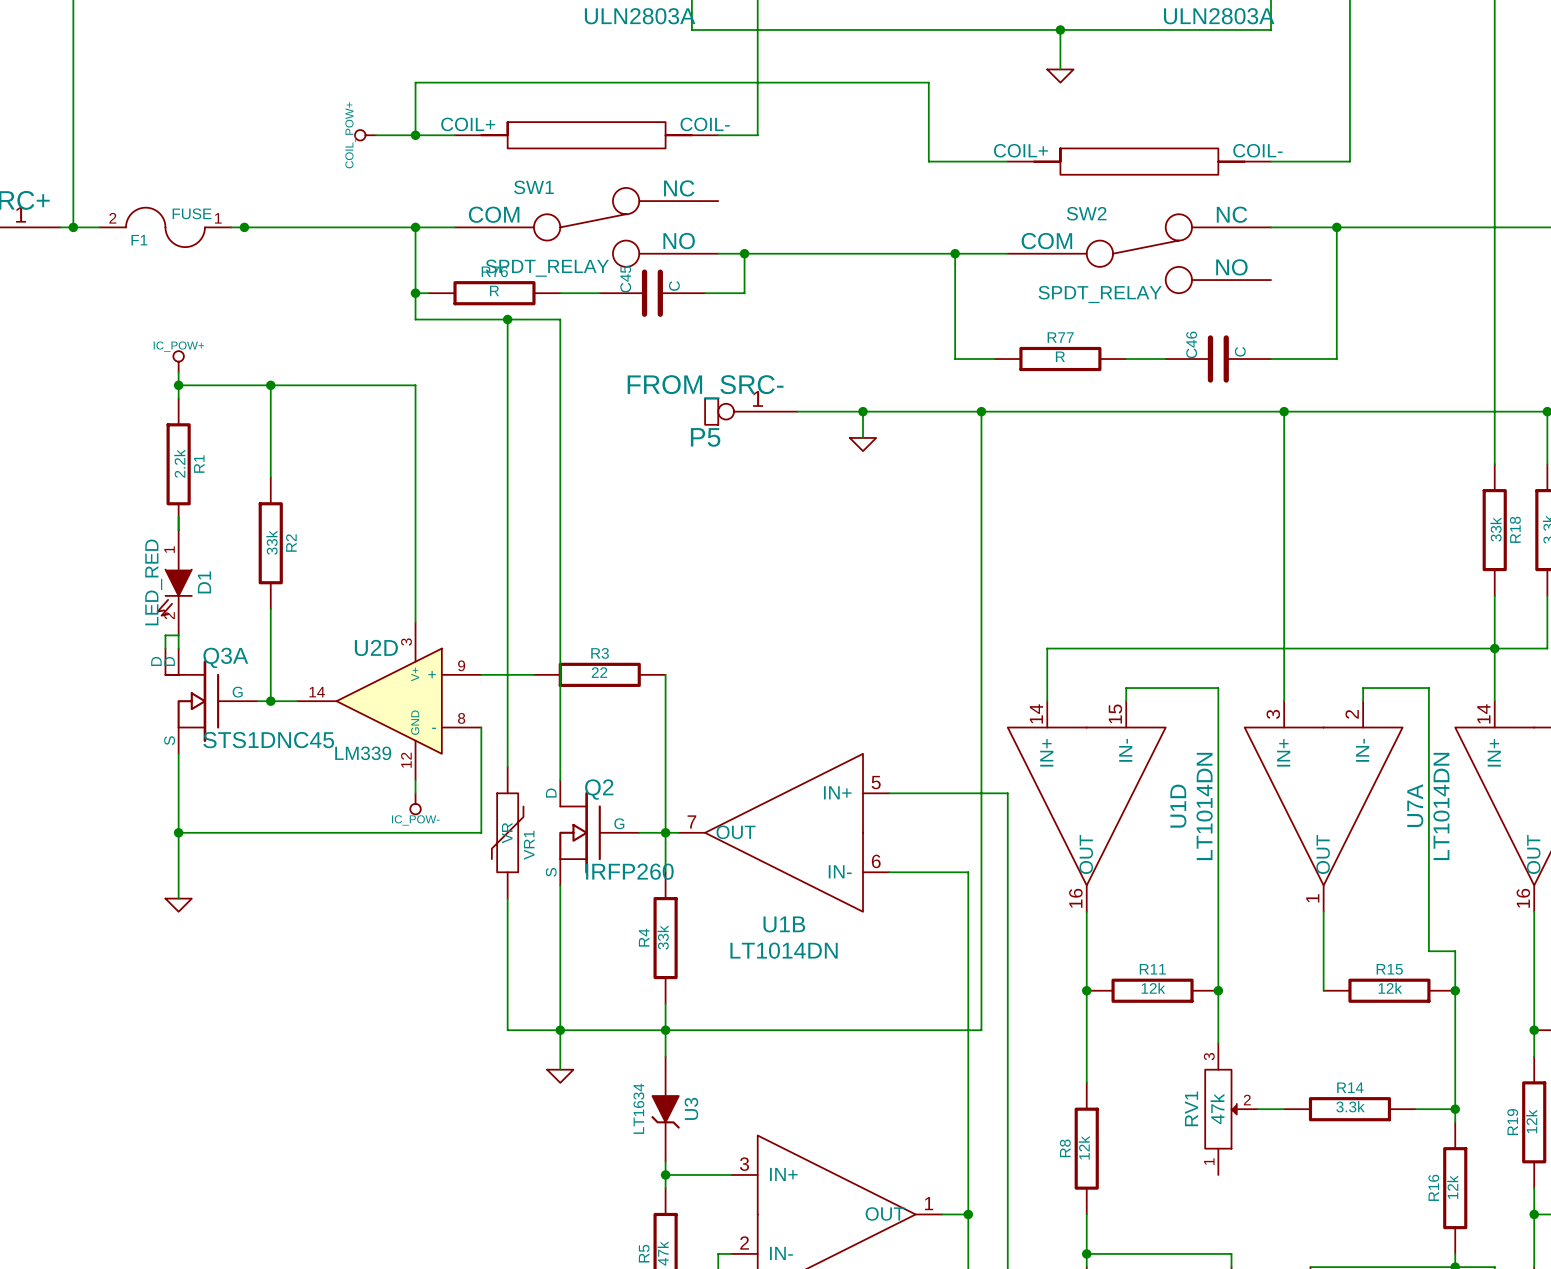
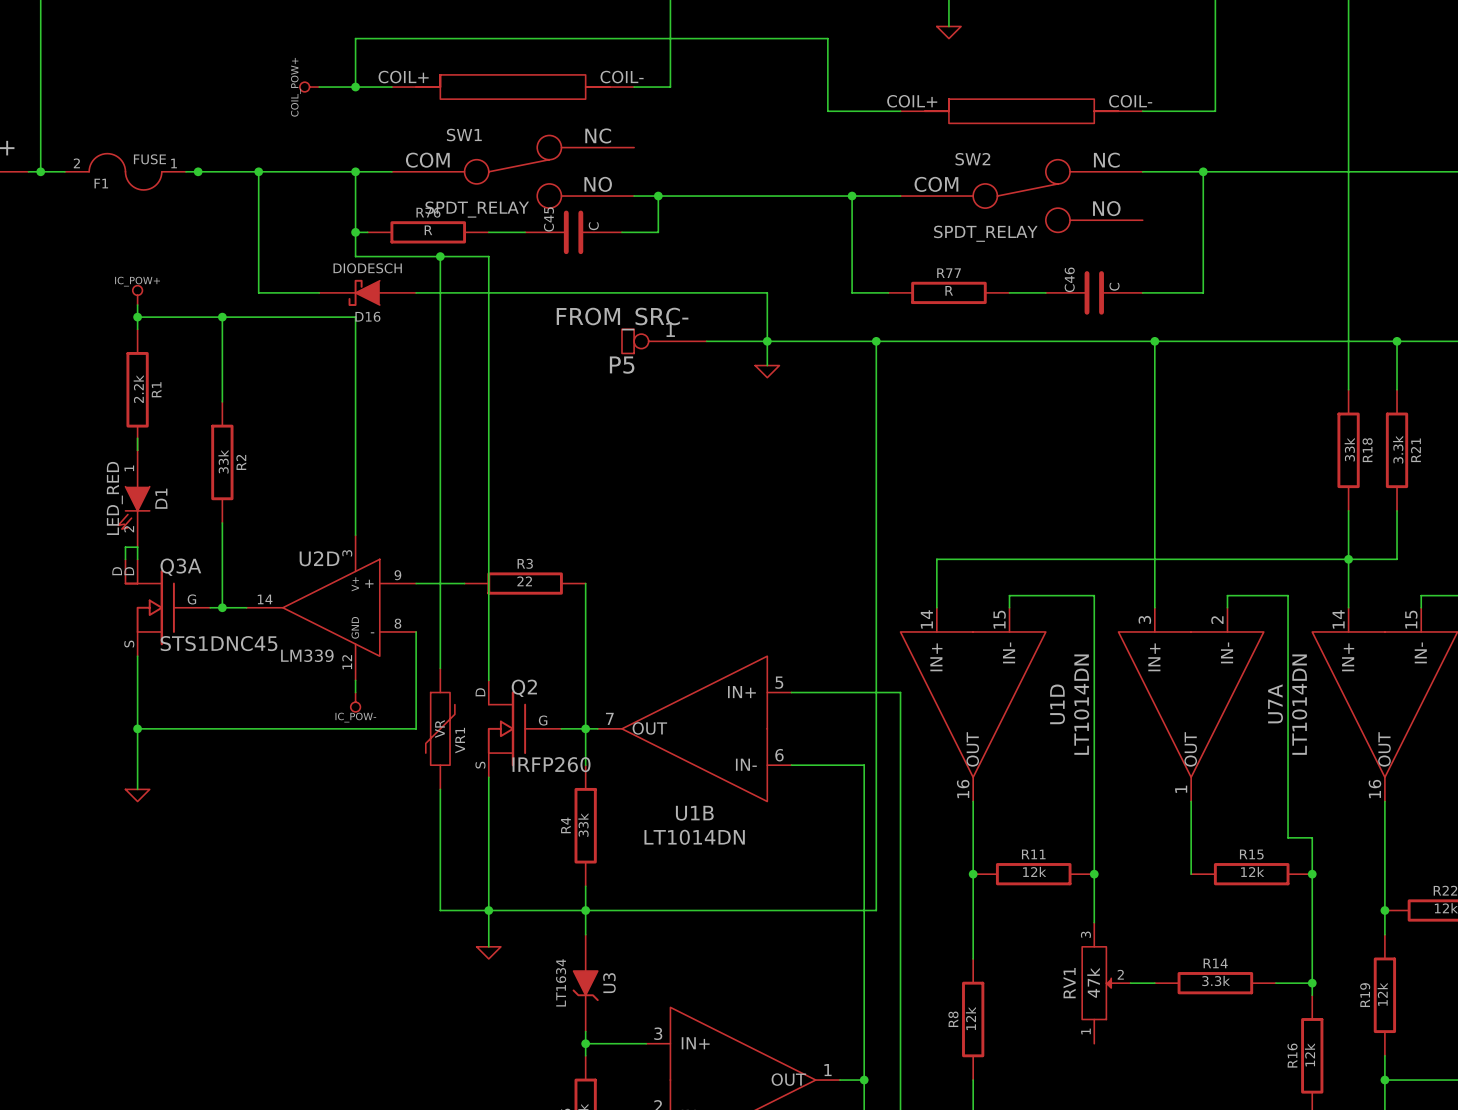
wire: none -> (258, 171) (258, 292) (319, 292)
junction: none -> (258, 171)
D16: none -> DIODESCH (367, 292)
wire: none -> (416, 292) (767, 292) (767, 341)

